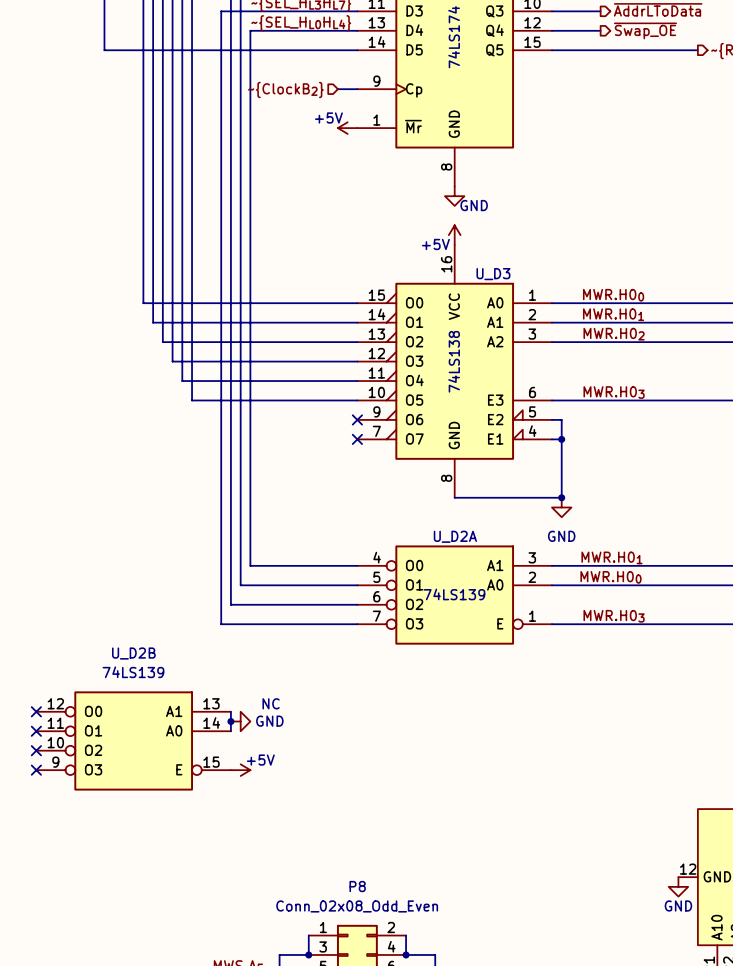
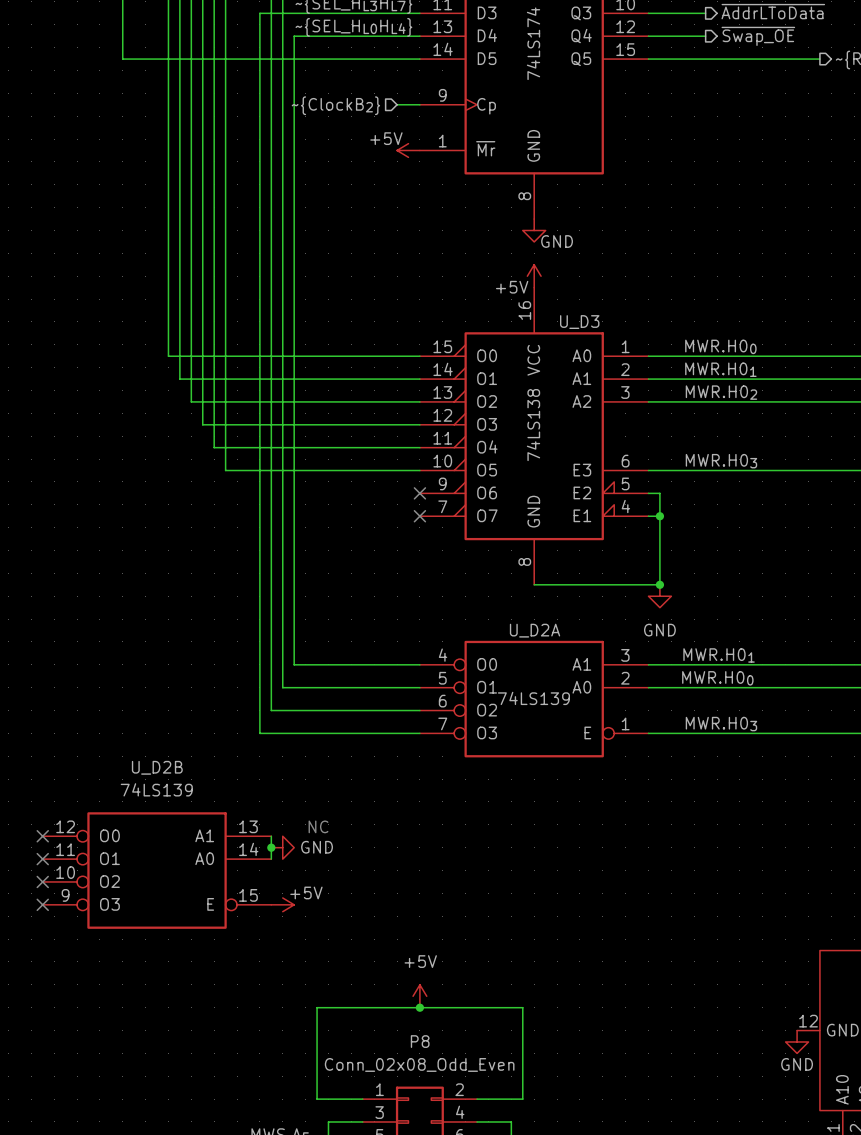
power symbol: none -> +5V (419, 996)
junction: none -> (419, 1007)
wire: (308, 935) (308, 954) -> (362, 1099) (317, 1099) (317, 1007) (522, 1007) (522, 1099) (477, 1099)
wire: (406, 935) (406, 954) -> none
junction: (308, 954) -> none
junction: (406, 954) -> none

